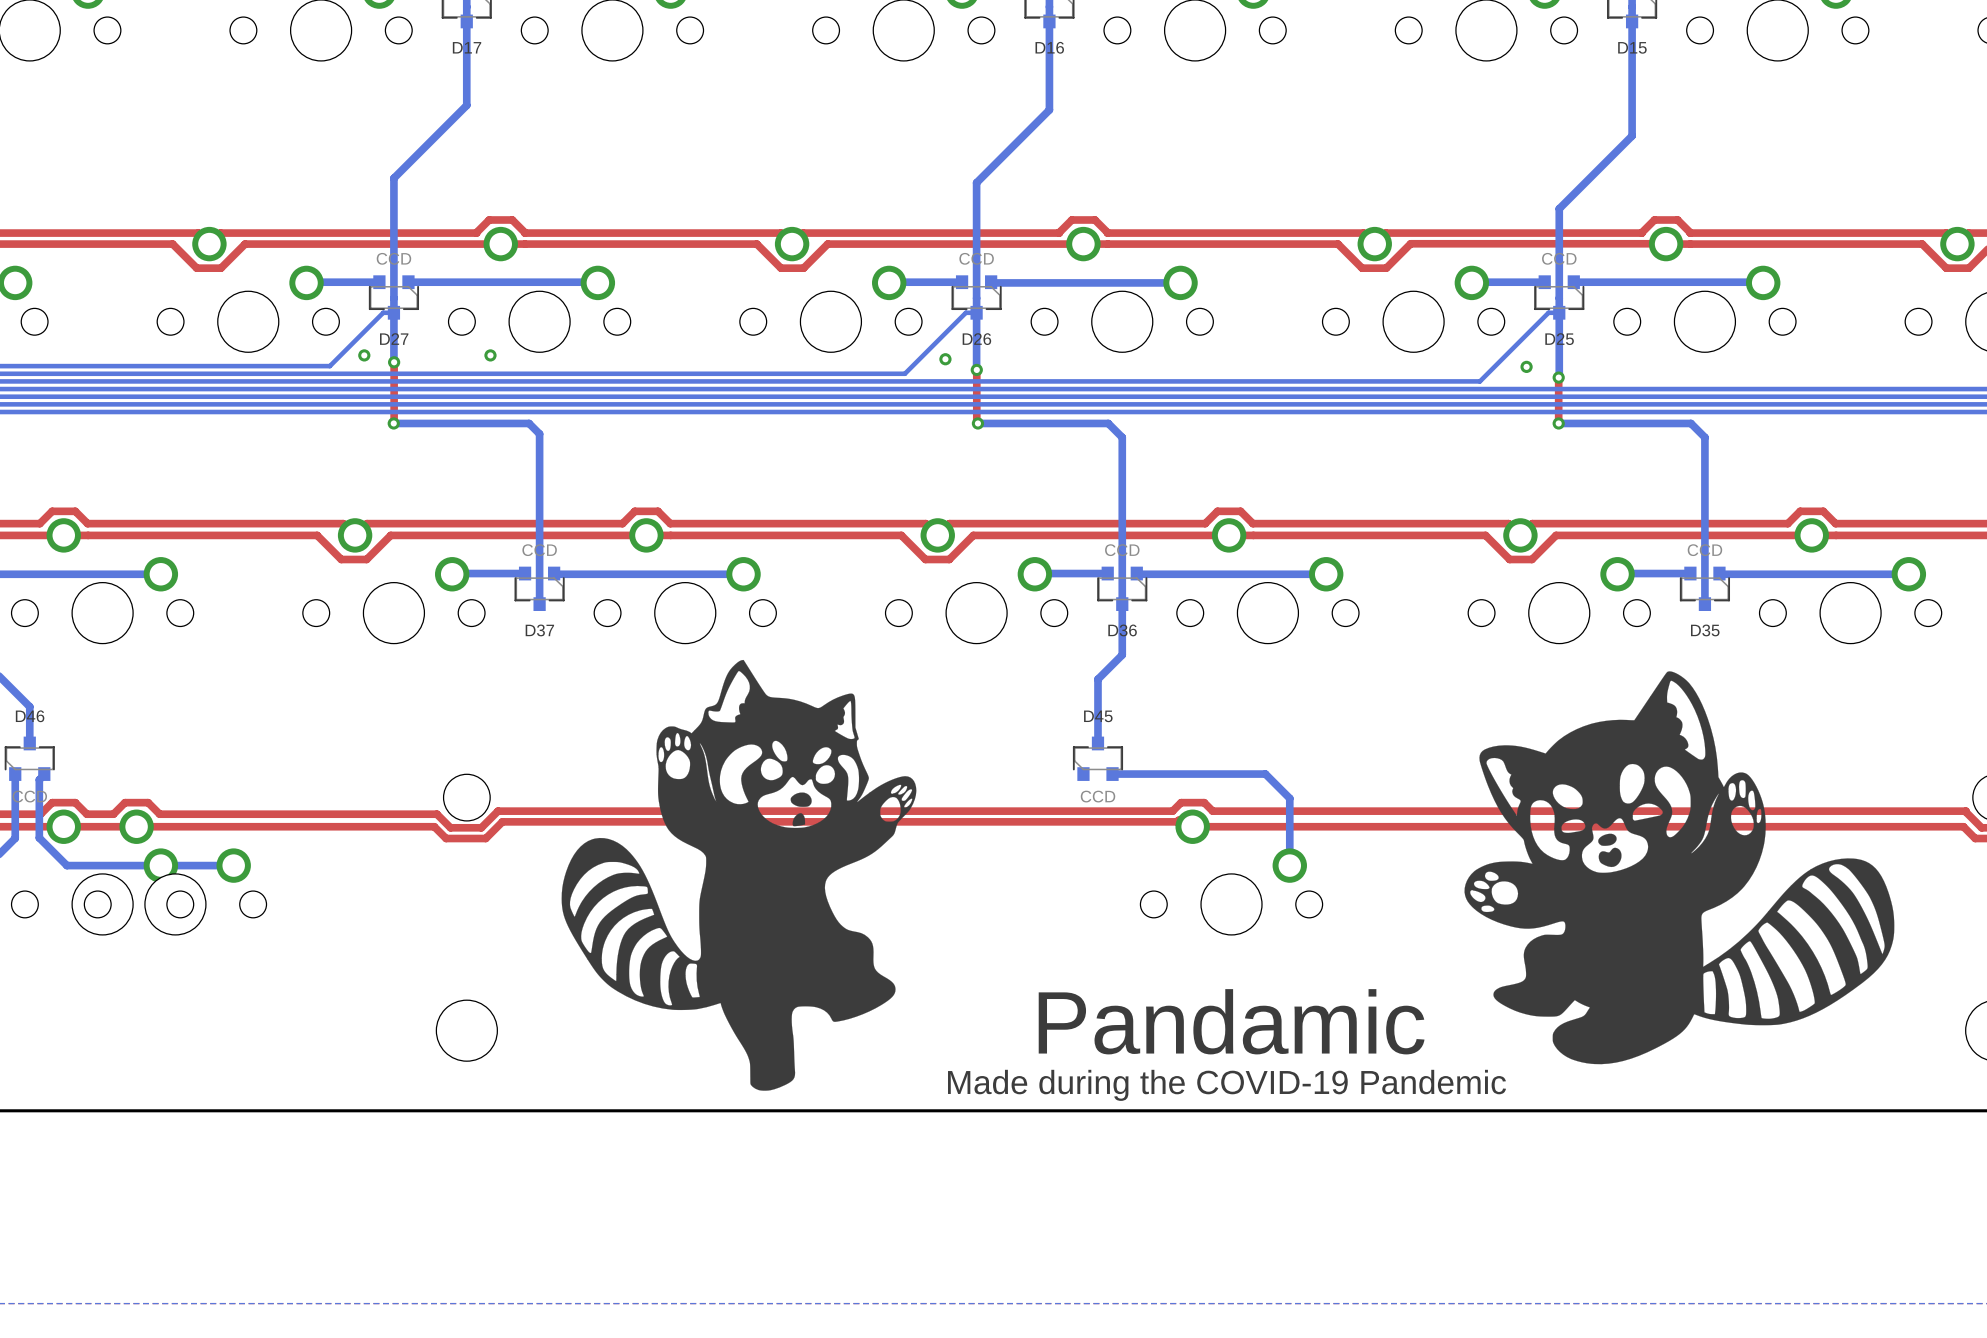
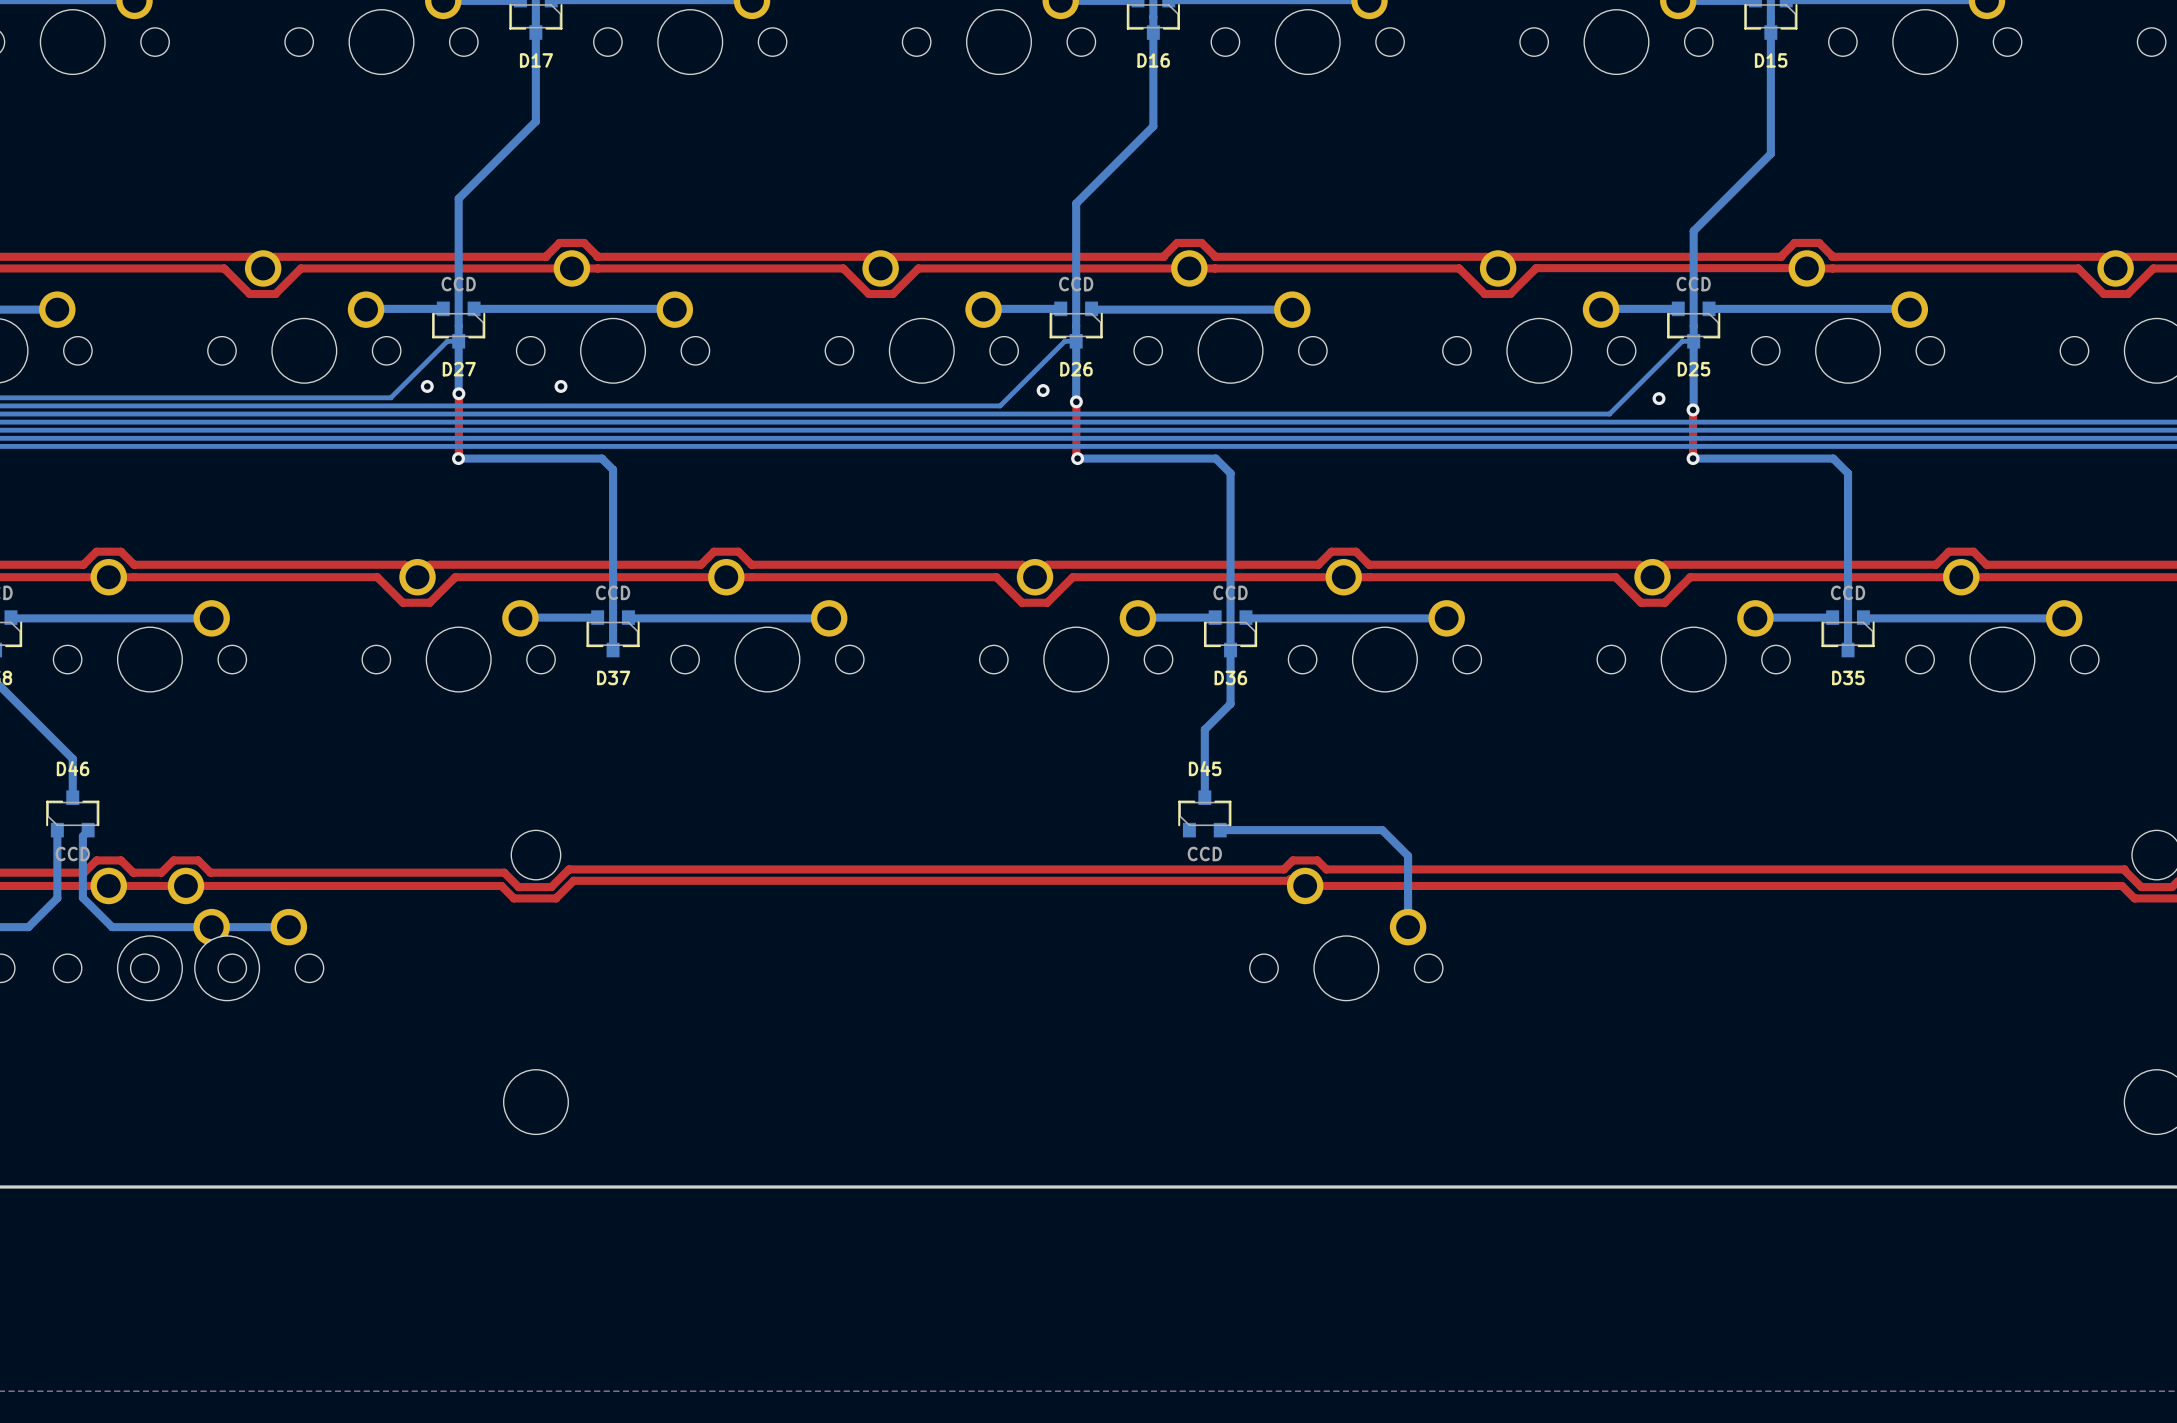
drawing: [561, 659, 917, 1091] -> none
drawing: [1464, 671, 1895, 1065] -> none
text: Pandamic (1231, 1021) -> none
text: Made during the COVID-19 Pandemic (1226, 1085) -> none

